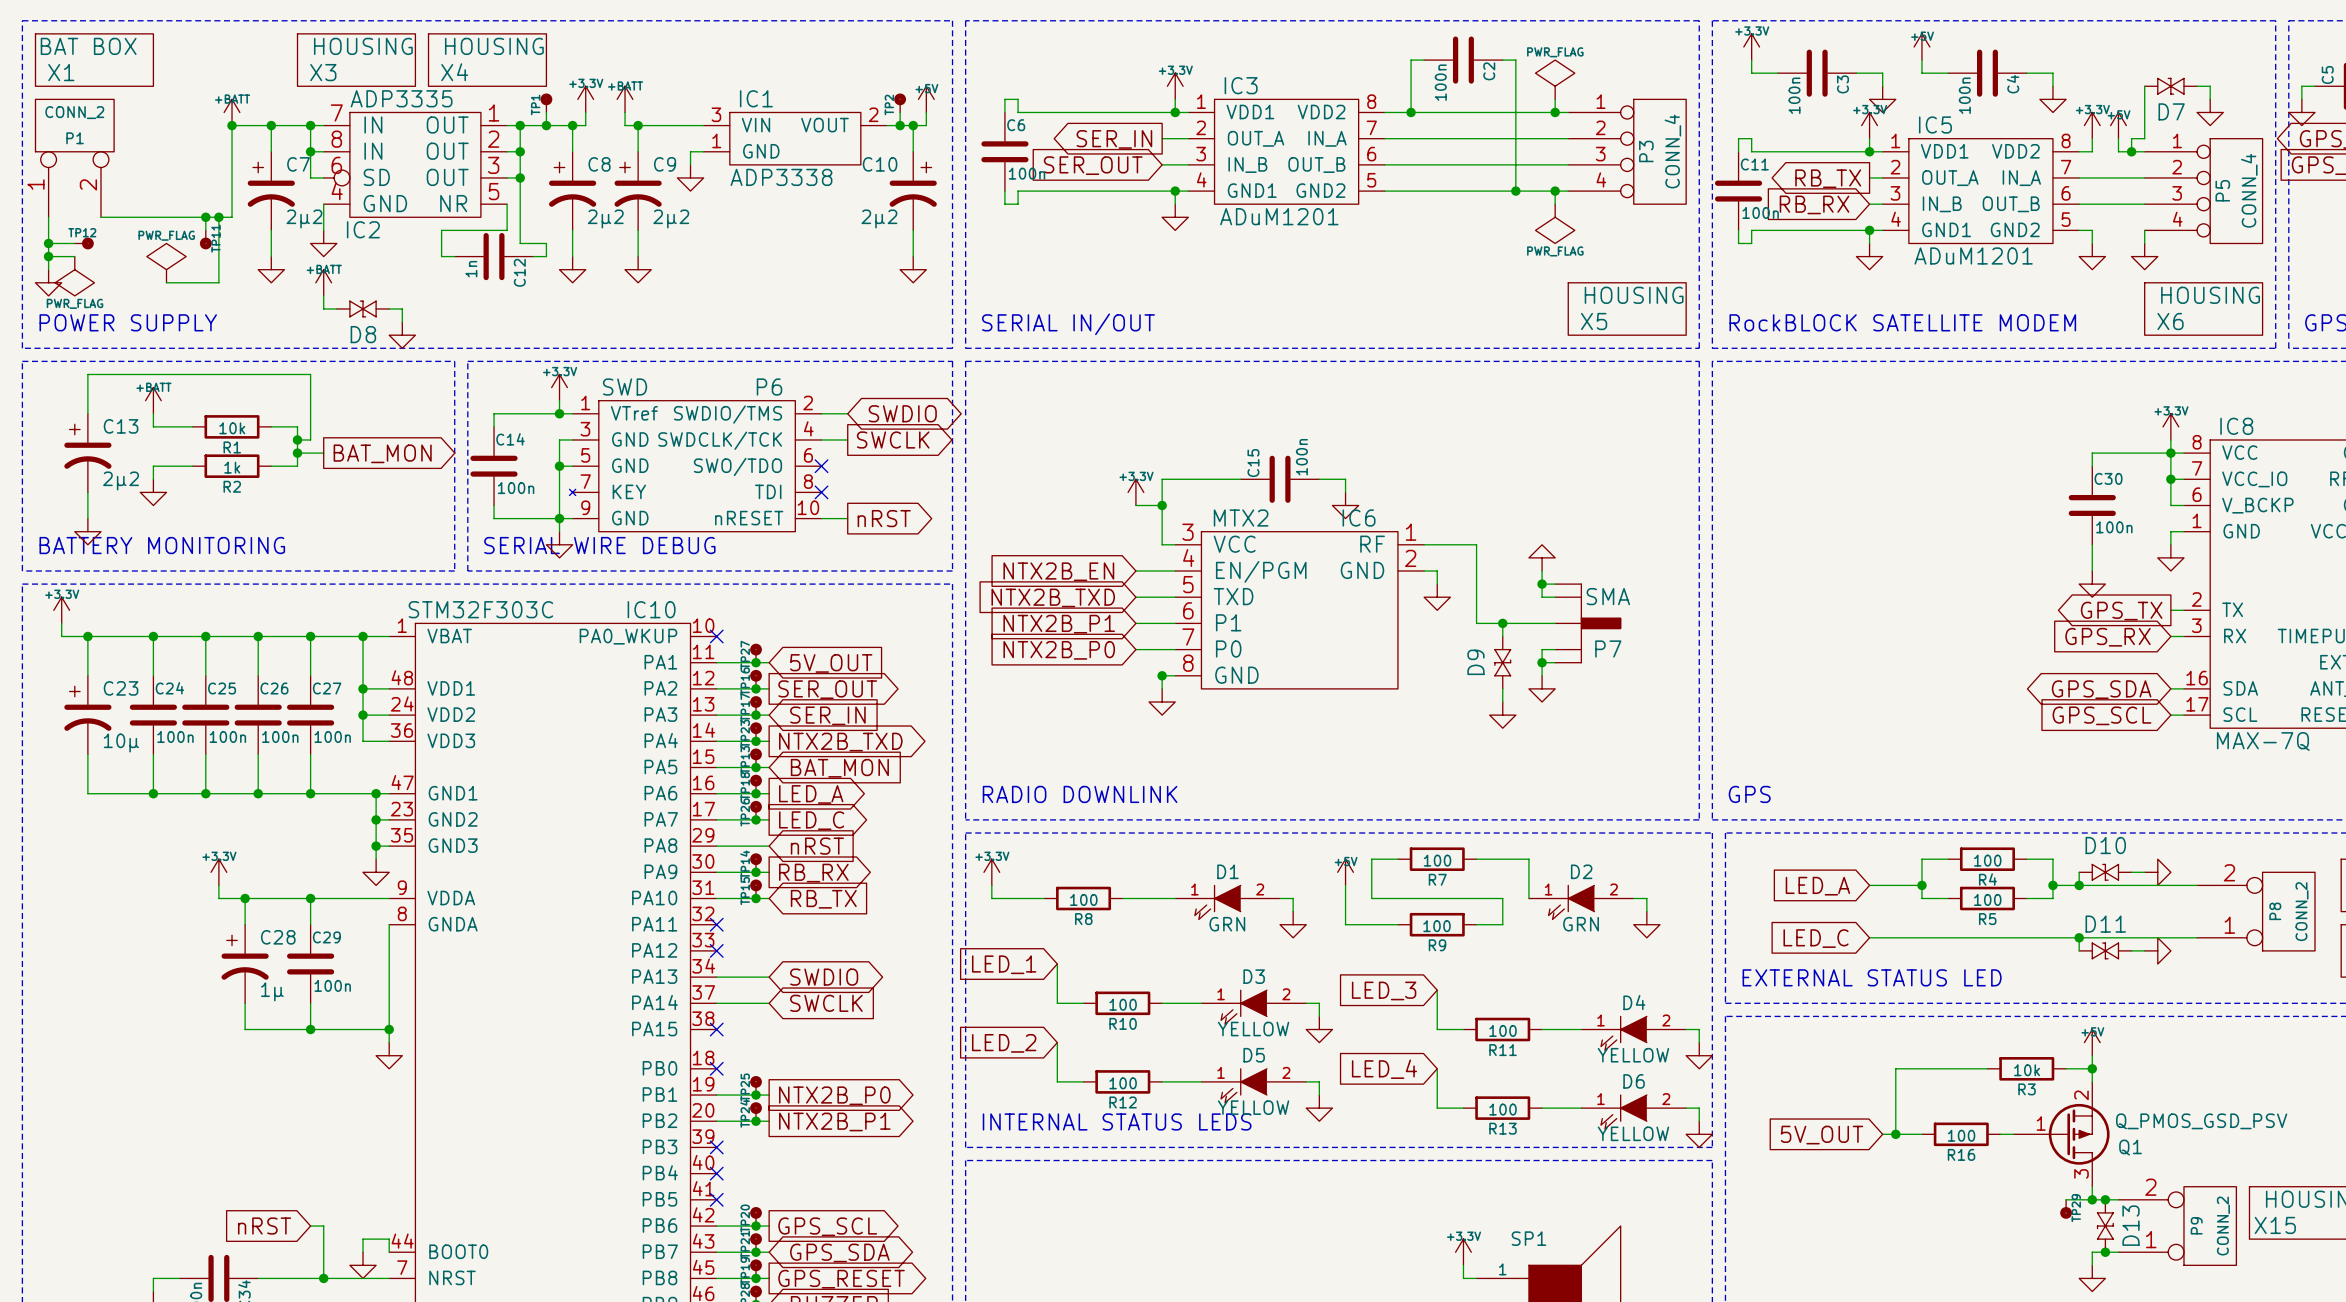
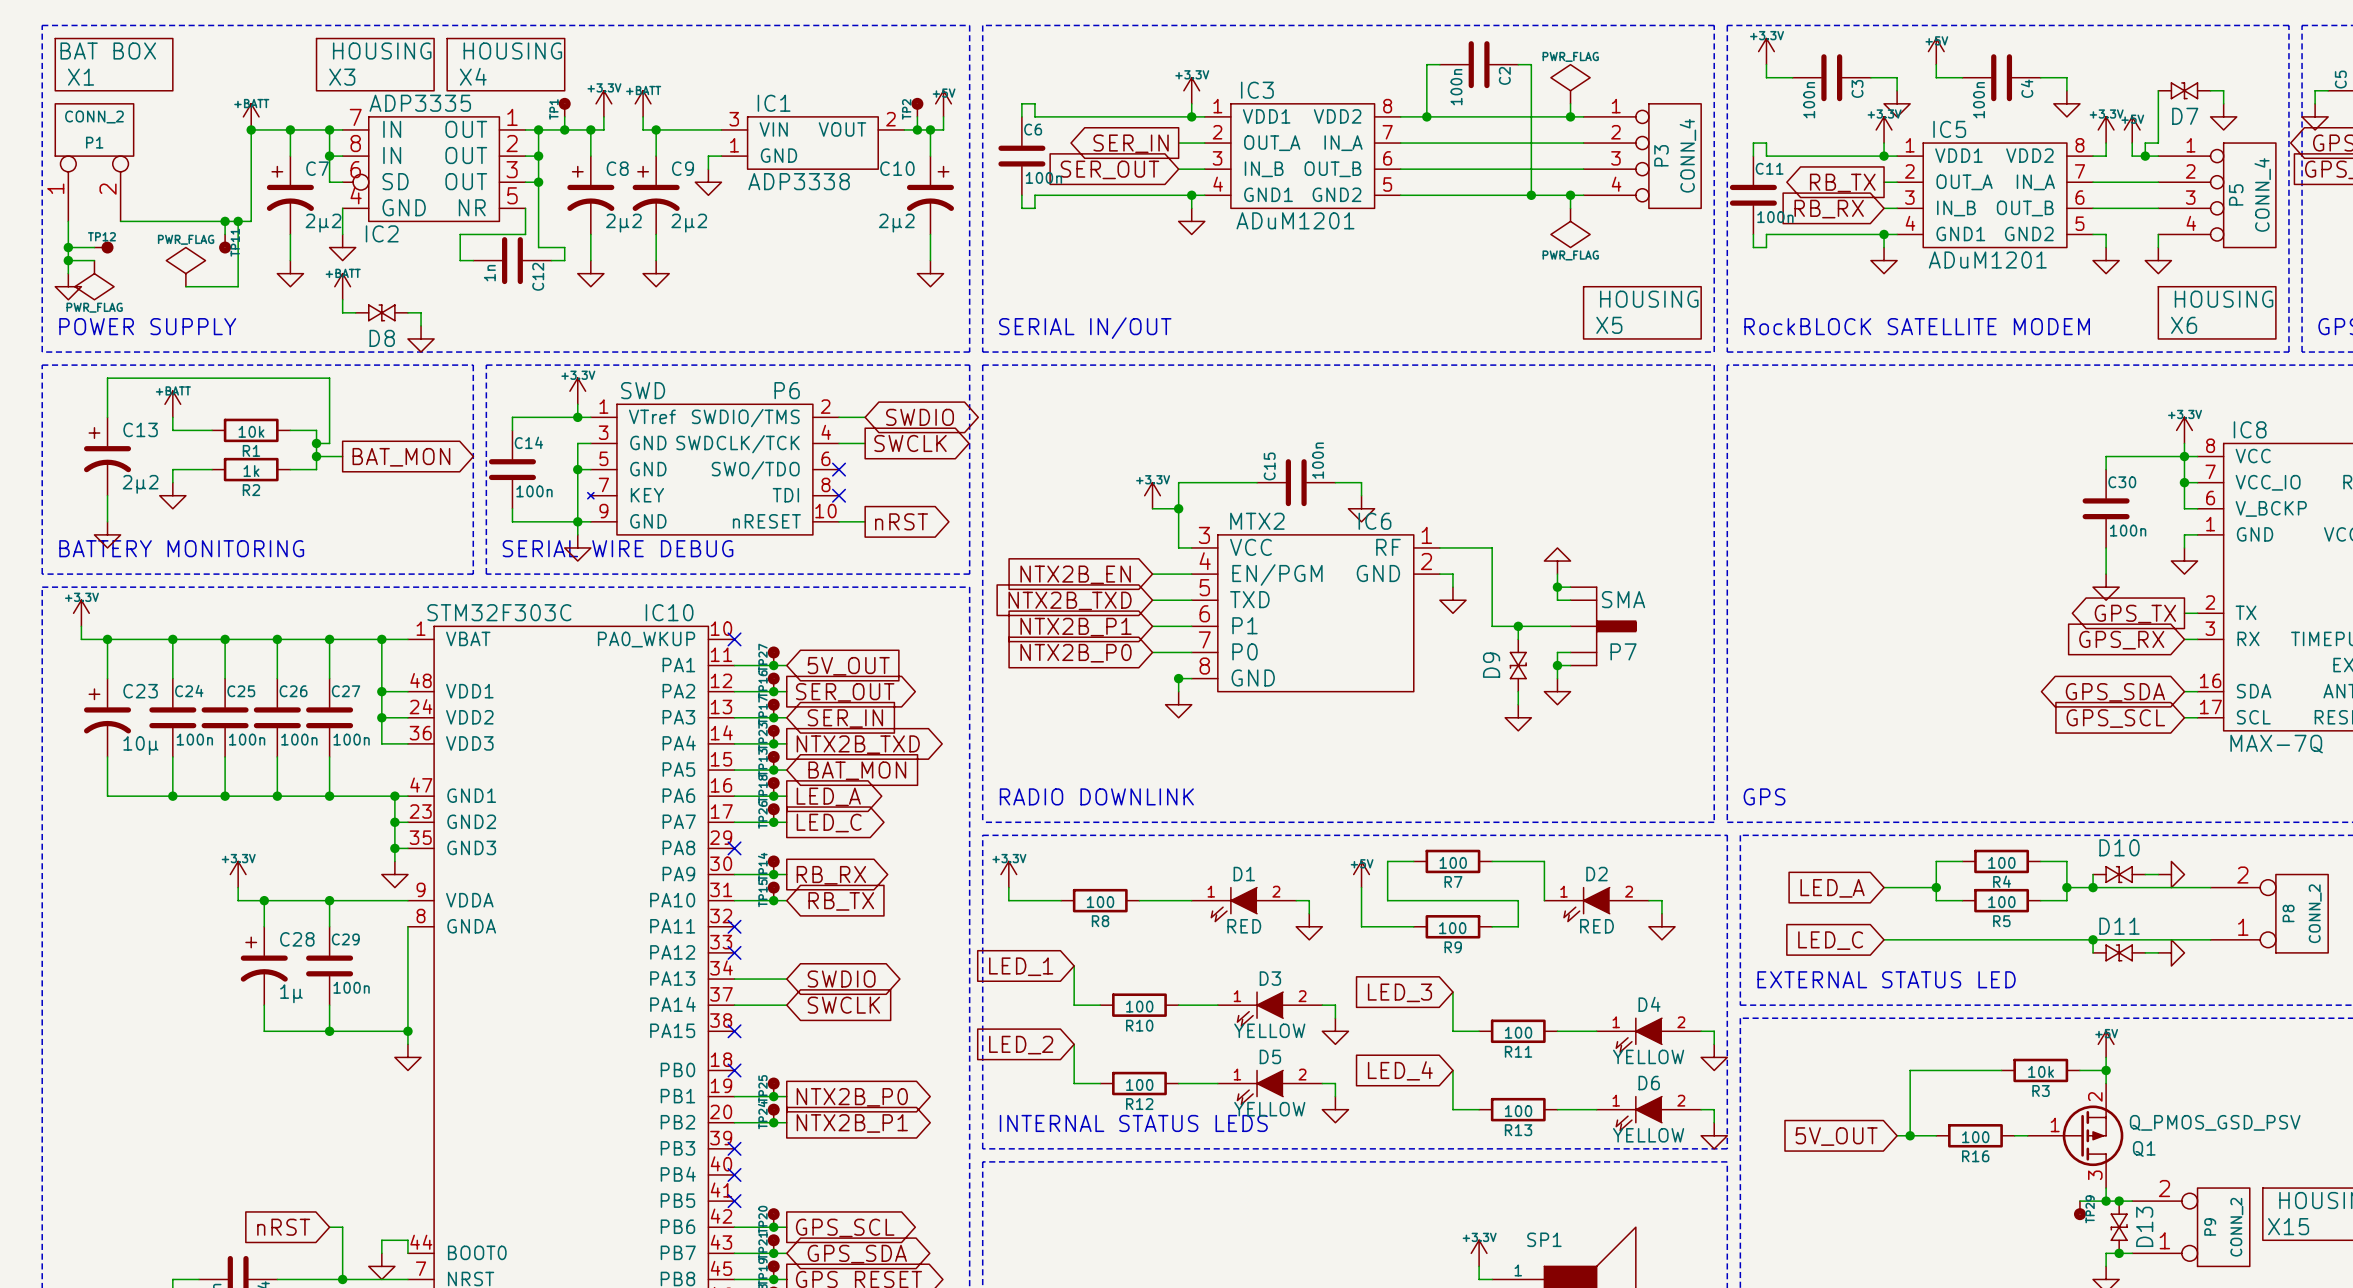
wire: (716, 846) (769, 846) -> none
no-connect mark: none -> (734, 848)
global label: nRST (817, 846) -> none
D1 value: GRN (1227, 924) -> RED (1244, 926)
D2 value: GRN (1581, 924) -> RED (1596, 926)

